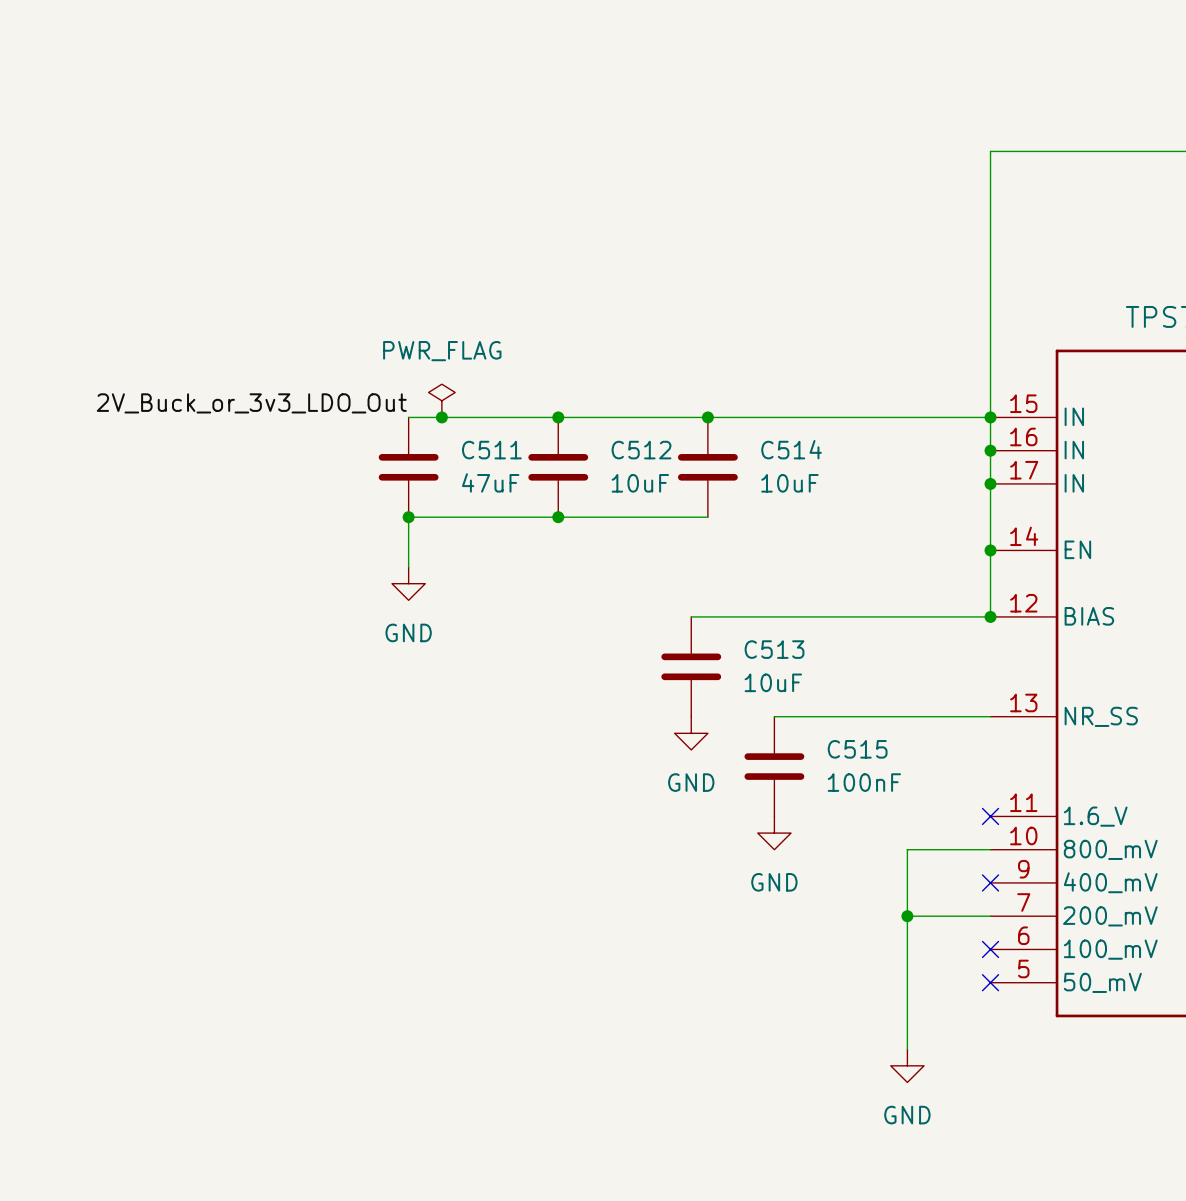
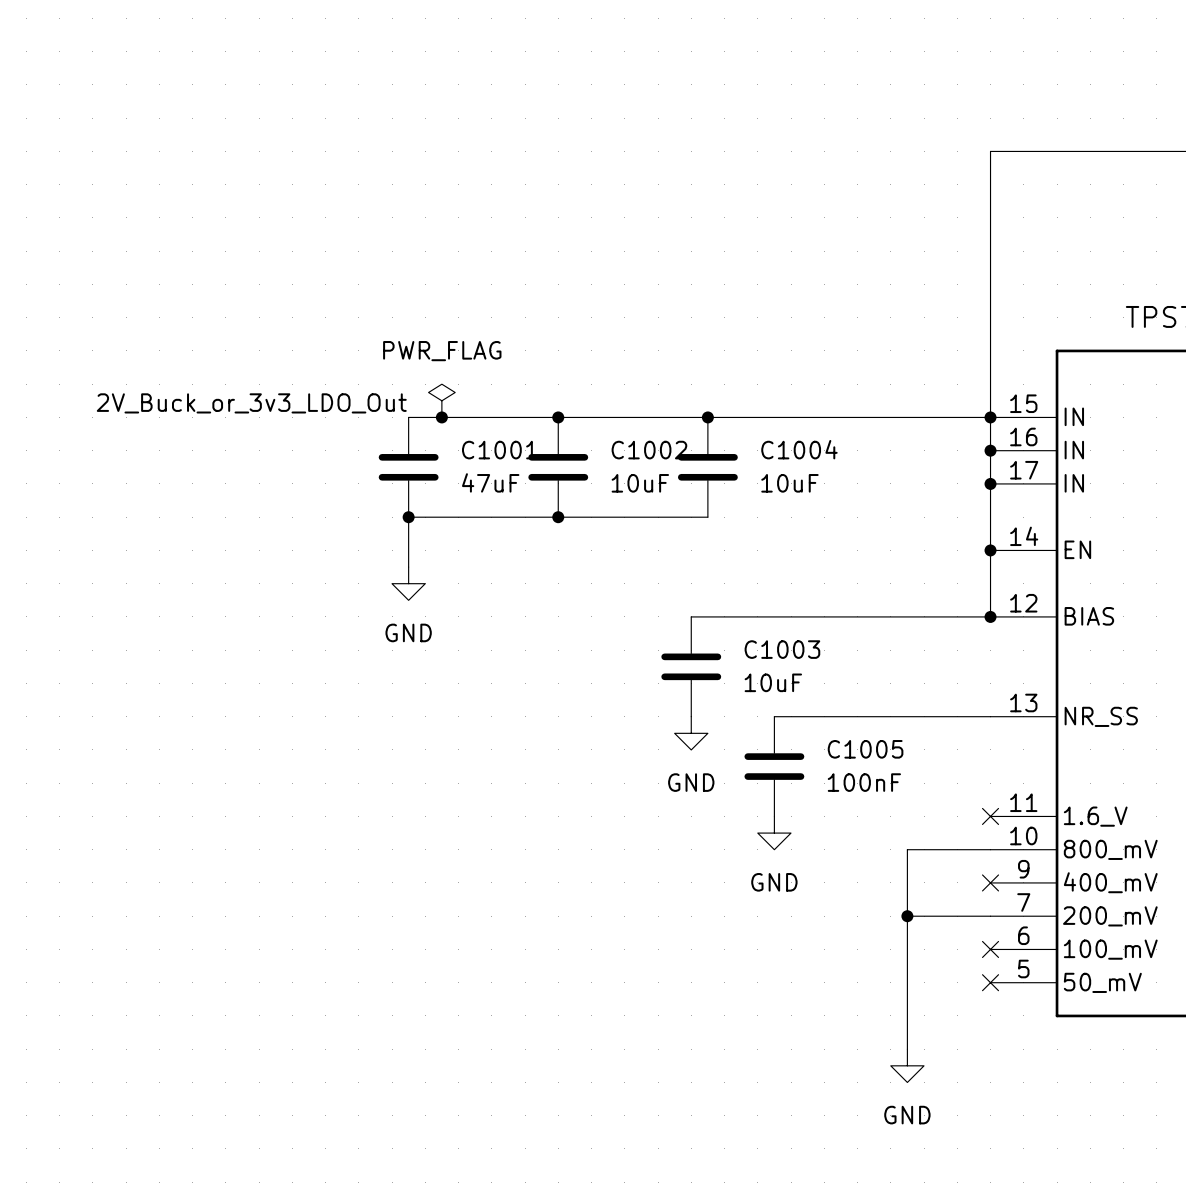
C514 name: C514 (791, 449) -> C1004 (799, 449)
C511 name: C511 (491, 450) -> C1001 (499, 450)
C512 name: C512 (641, 450) -> C1002 (649, 450)
C513 name: C513 (774, 649) -> C1003 (782, 649)
C515 name: C515 (857, 749) -> C1005 (865, 749)

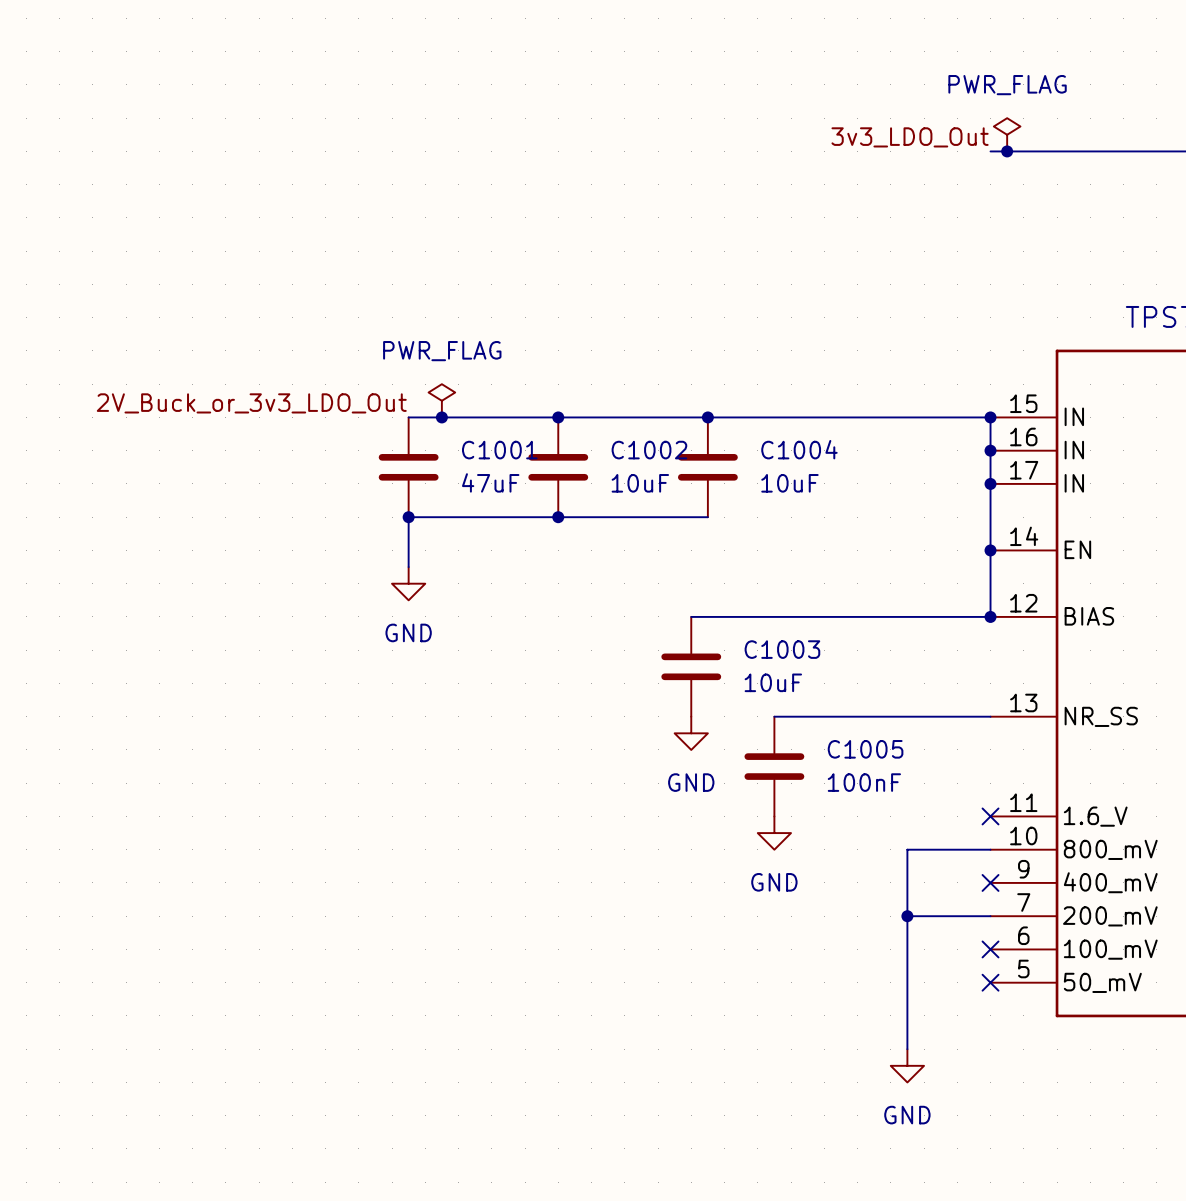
power symbol: none -> PWR_FLAG (1007, 134)
label: none -> 3v3_LDO_Out (910, 137)
wire: (990, 151) (990, 417) -> none
junction: none -> (1007, 151)

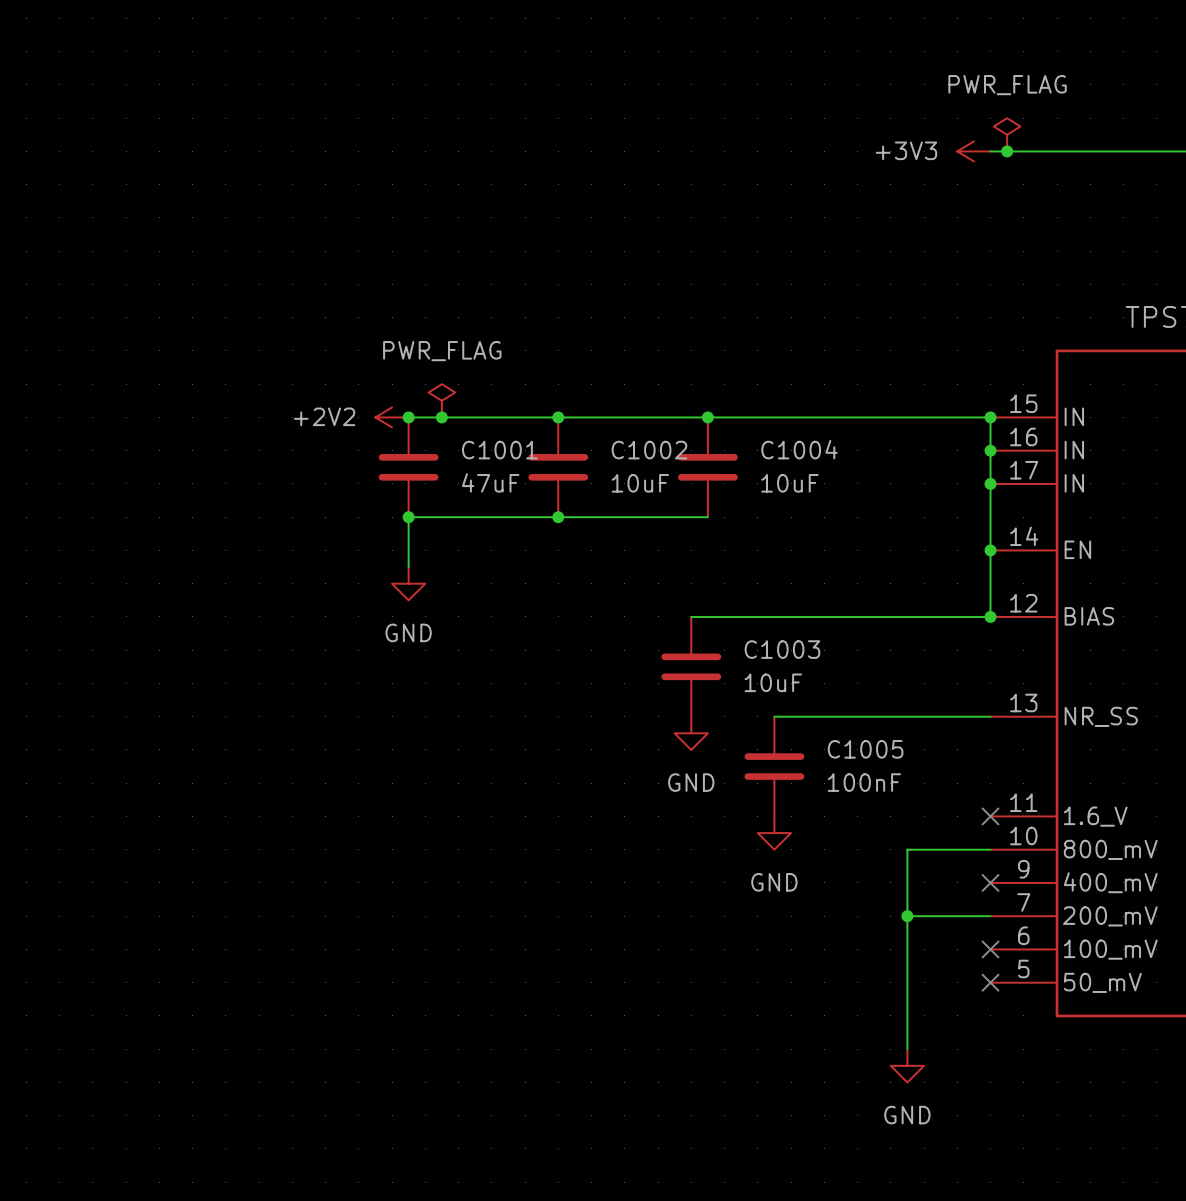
label: 3v3_LDO_Out (910, 137) -> none
power symbol: none -> +3V3 (973, 151)
label: 2V_Buck_or_3v3_LDO_Out (251, 403) -> none
power symbol: none -> +2V2 (392, 417)
junction: none -> (408, 417)

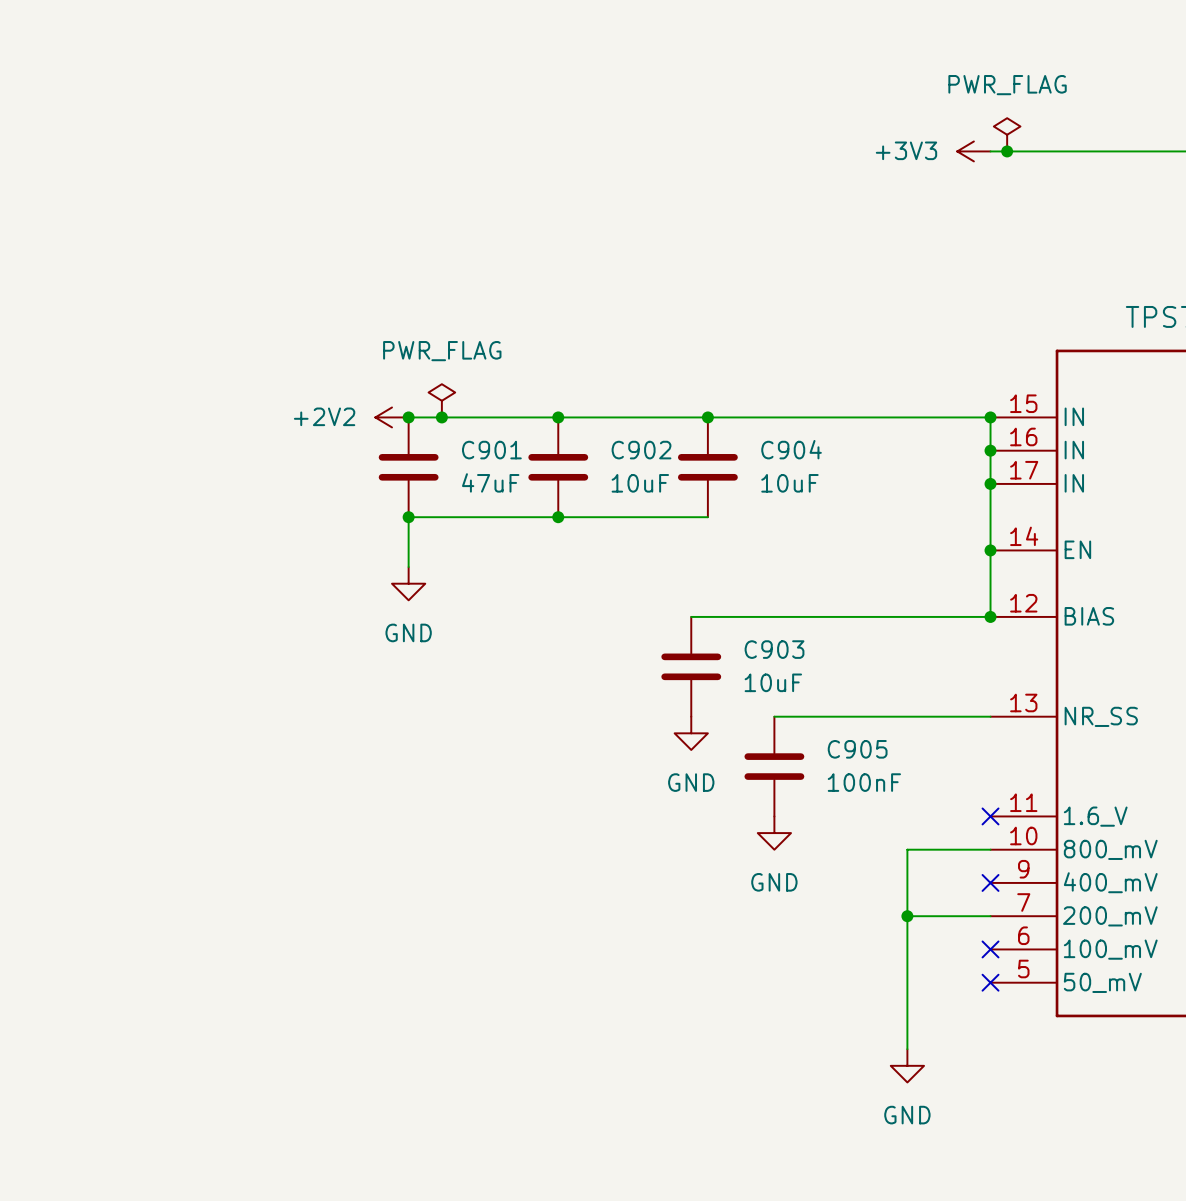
C1004 name: C1004 (799, 449) -> C904 (791, 449)
C1001 name: C1001 (499, 450) -> C901 (491, 450)
C1002 name: C1002 (649, 450) -> C902 (641, 450)
C1003 name: C1003 (782, 649) -> C903 (774, 649)
C1005 name: C1005 (865, 749) -> C905 (857, 749)

